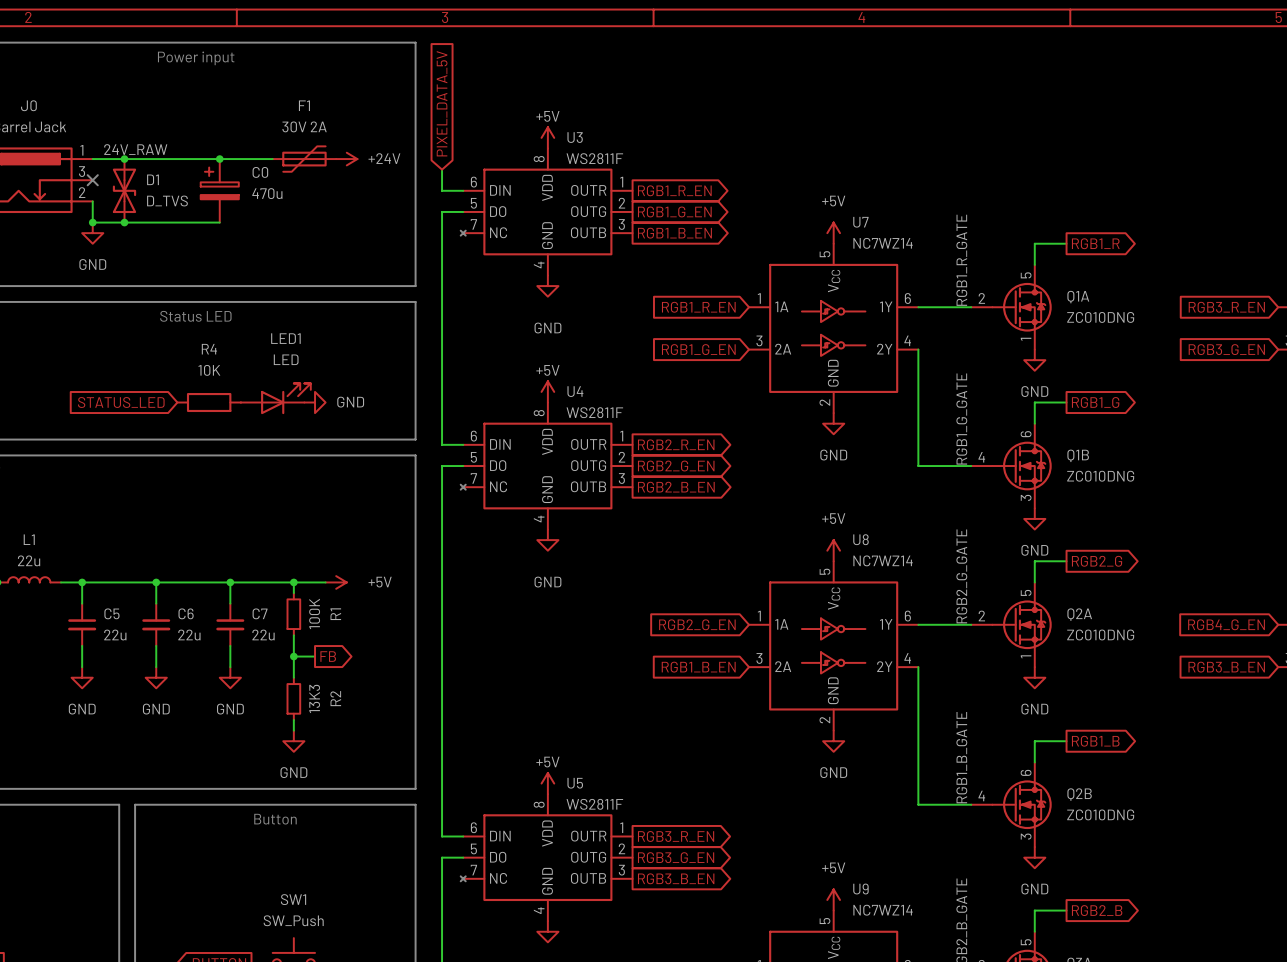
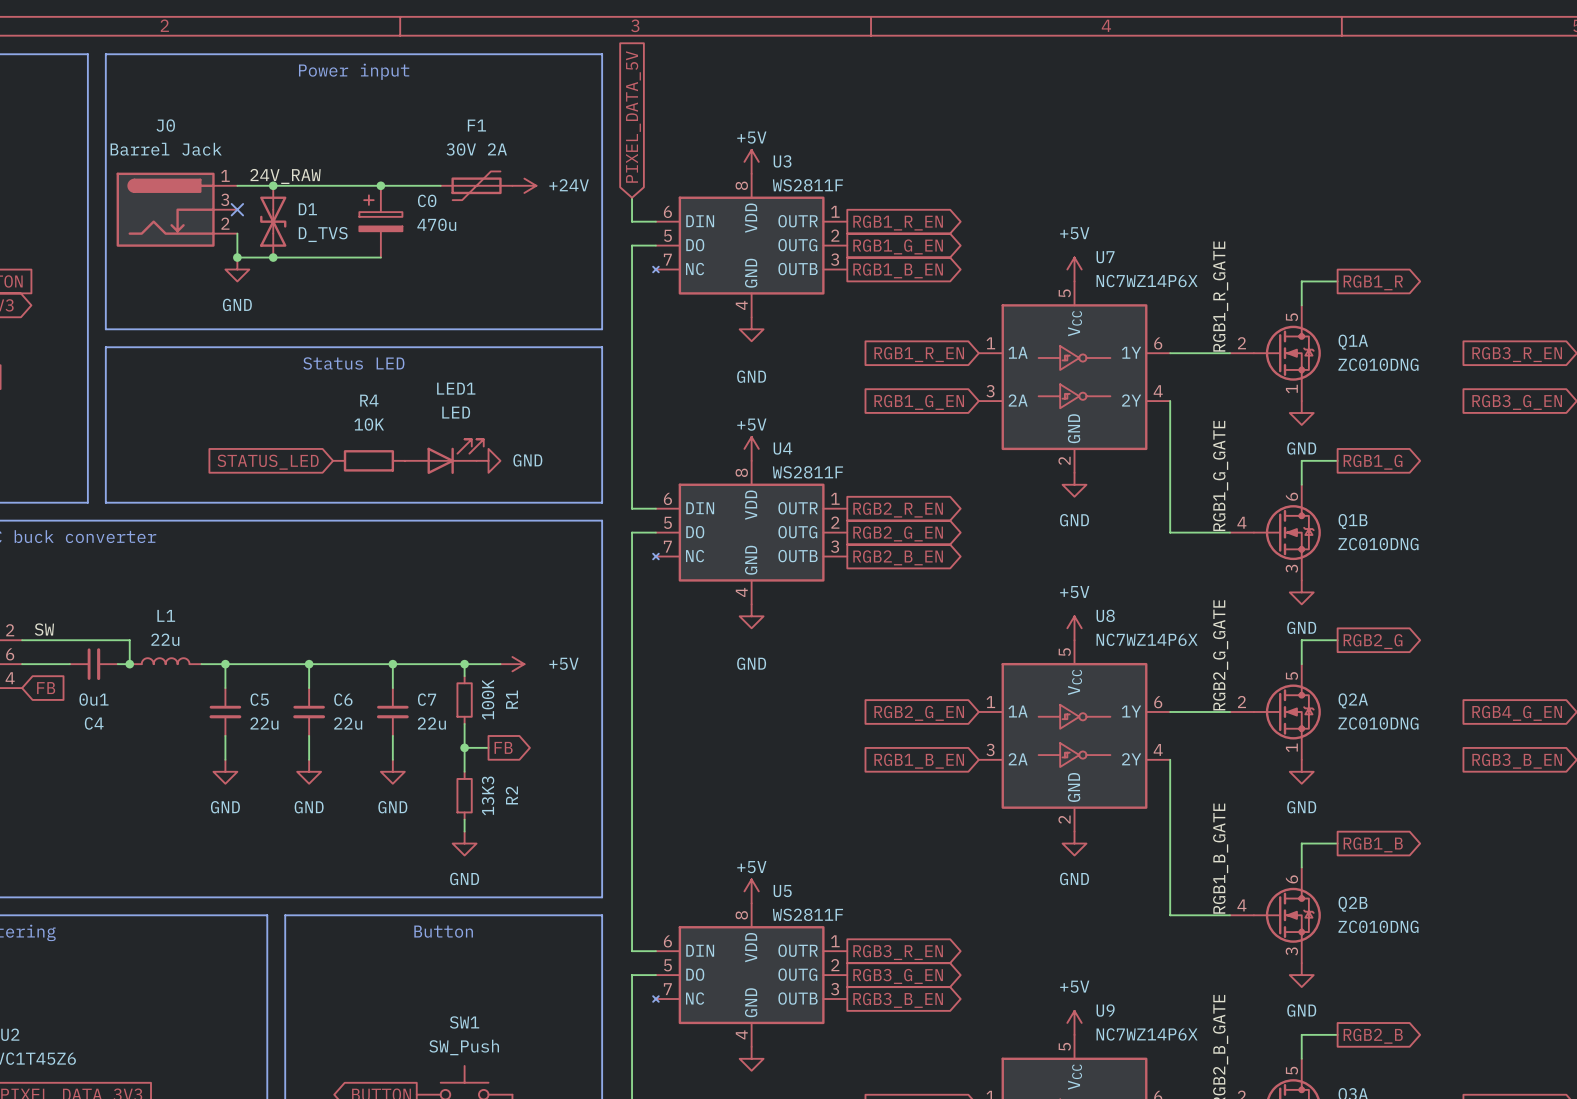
U7 value: NC7WZ14 (883, 243) -> NC7WZ14P6X (1147, 281)
U8 value: NC7WZ14 (883, 560) -> NC7WZ14P6X (1147, 639)
U9 value: NC7WZ14 (883, 910) -> NC7WZ14P6X (1147, 1034)

